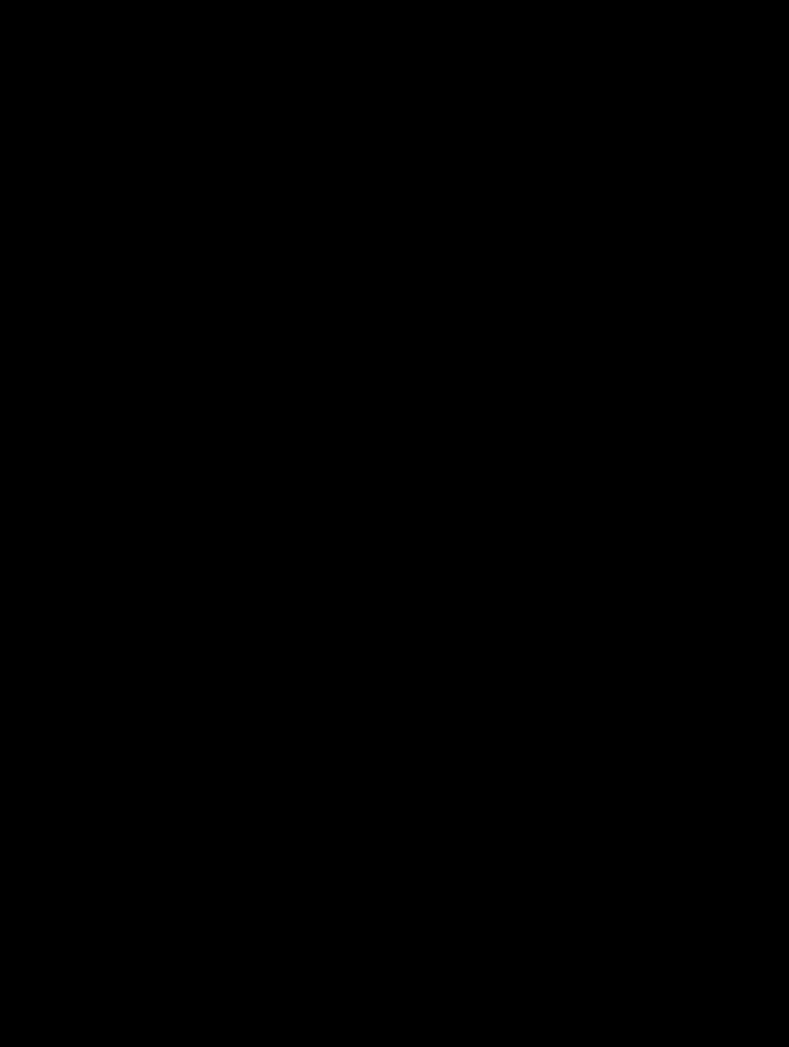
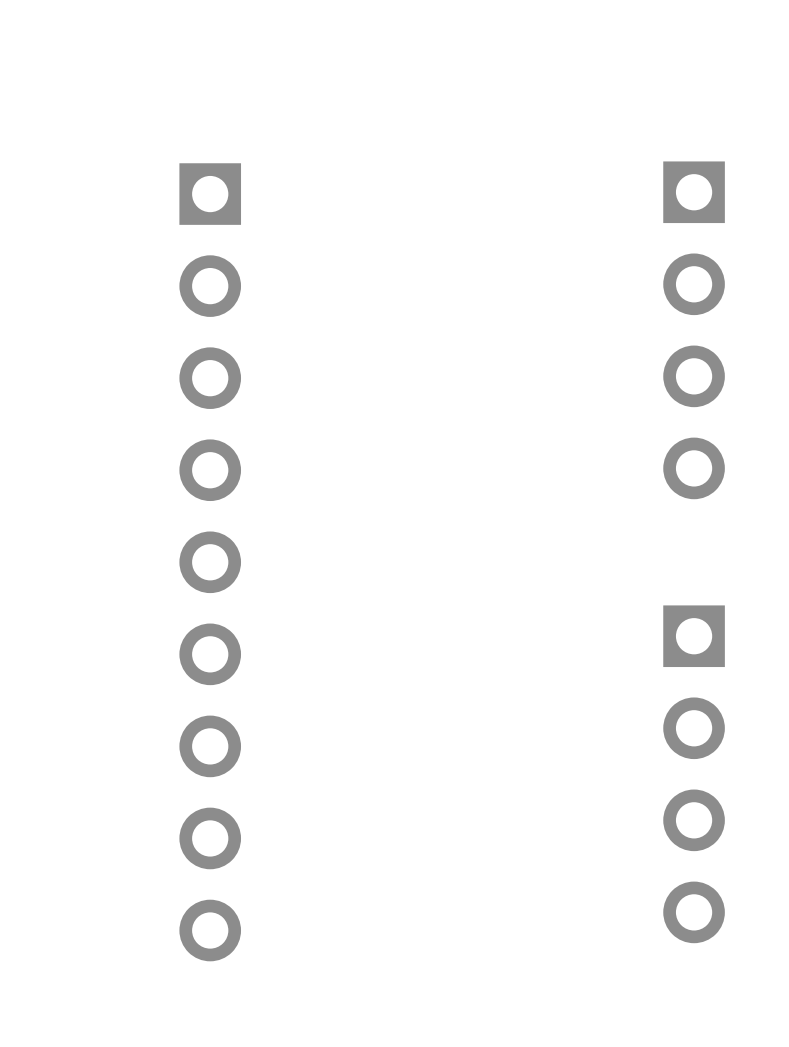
part: none -> (694, 330)
part: none -> (210, 562)
part: none -> (694, 774)

